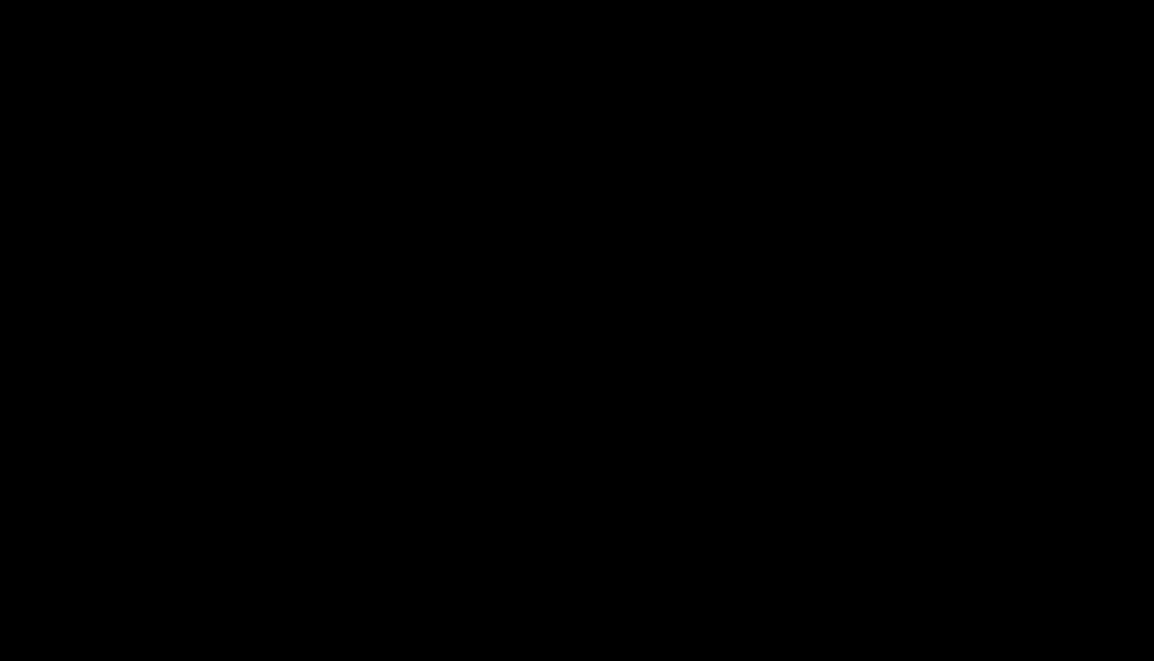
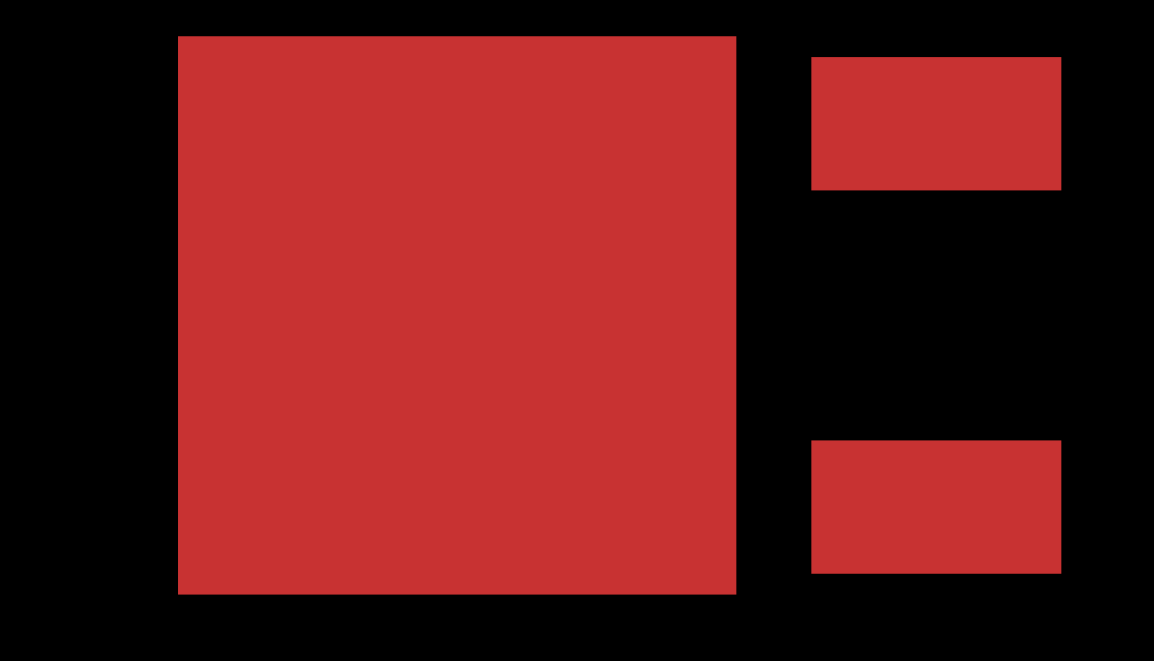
part: none -> (619, 315)

